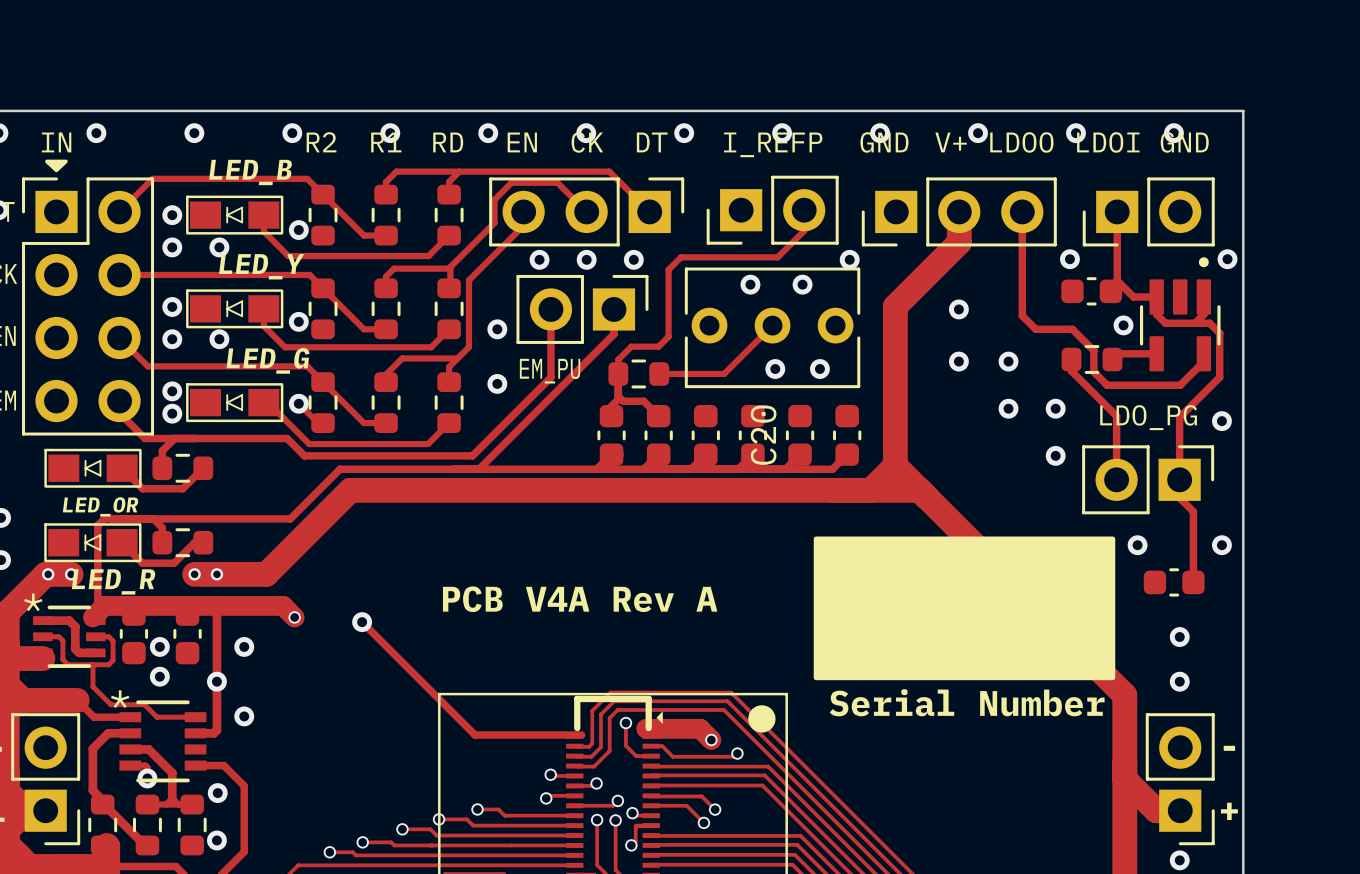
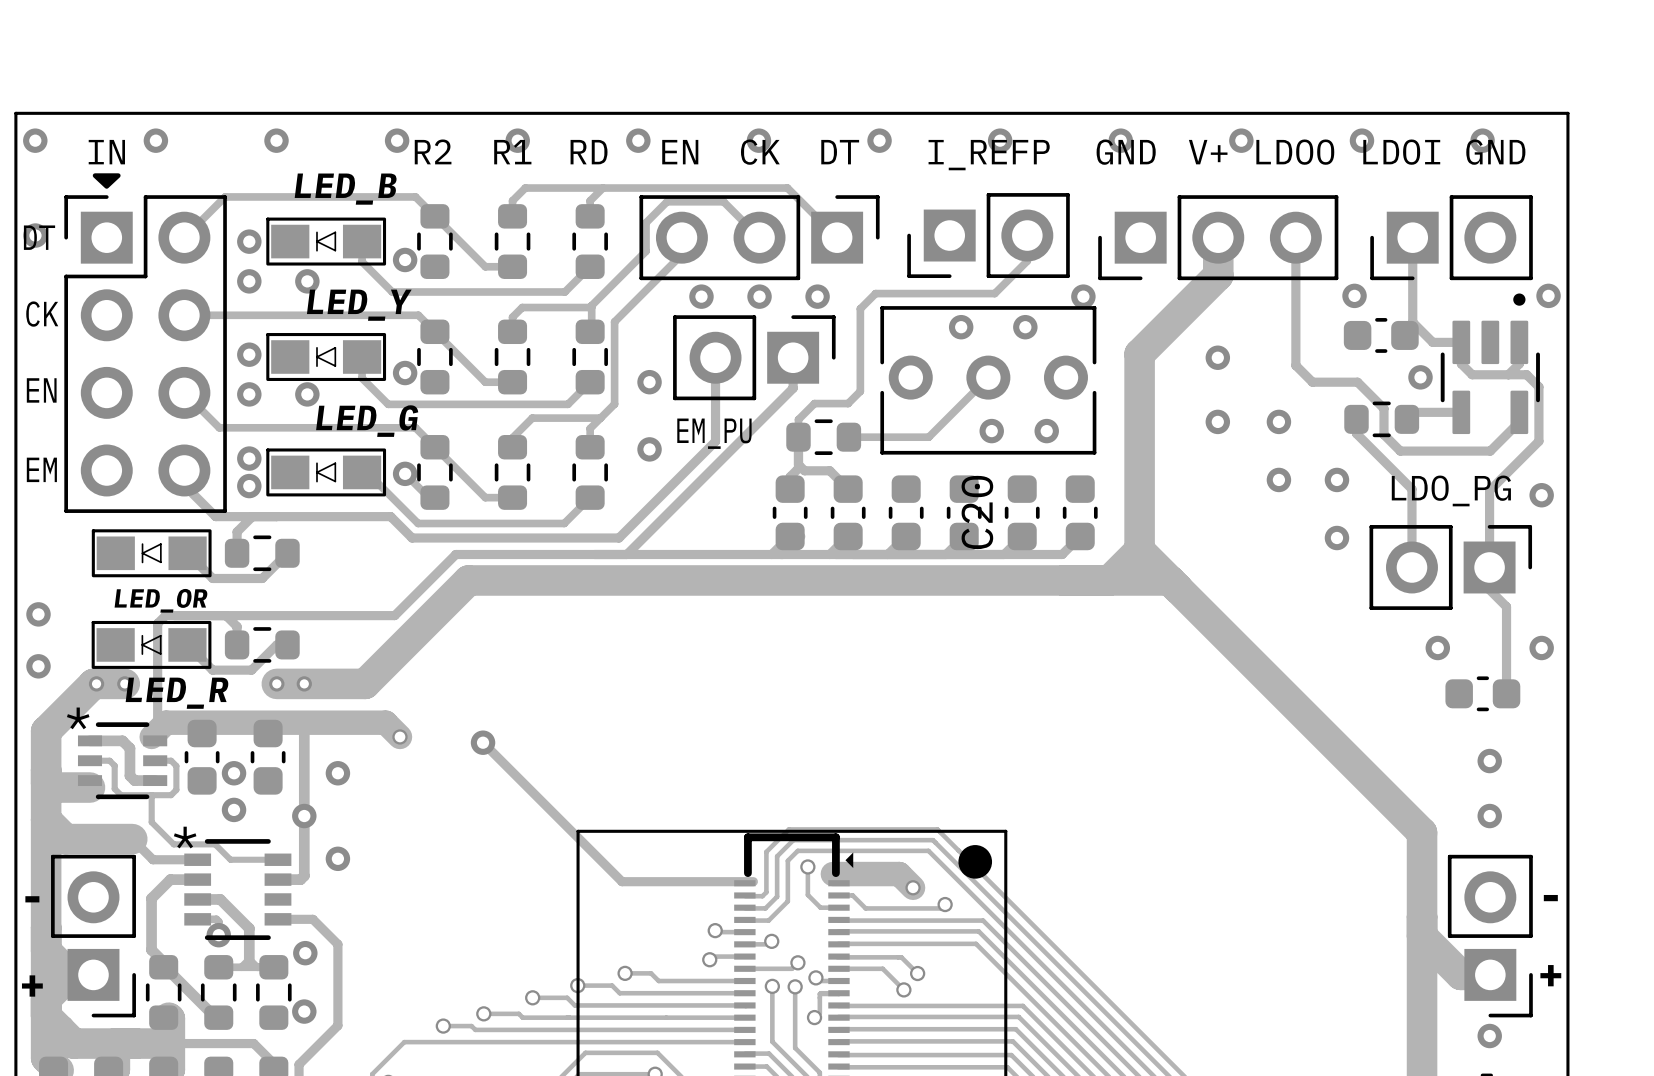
drawing: [813, 536, 1116, 681] -> none
text: PCB V4A Rev A (580, 599) -> none
text: Serial Number (967, 702) -> none

